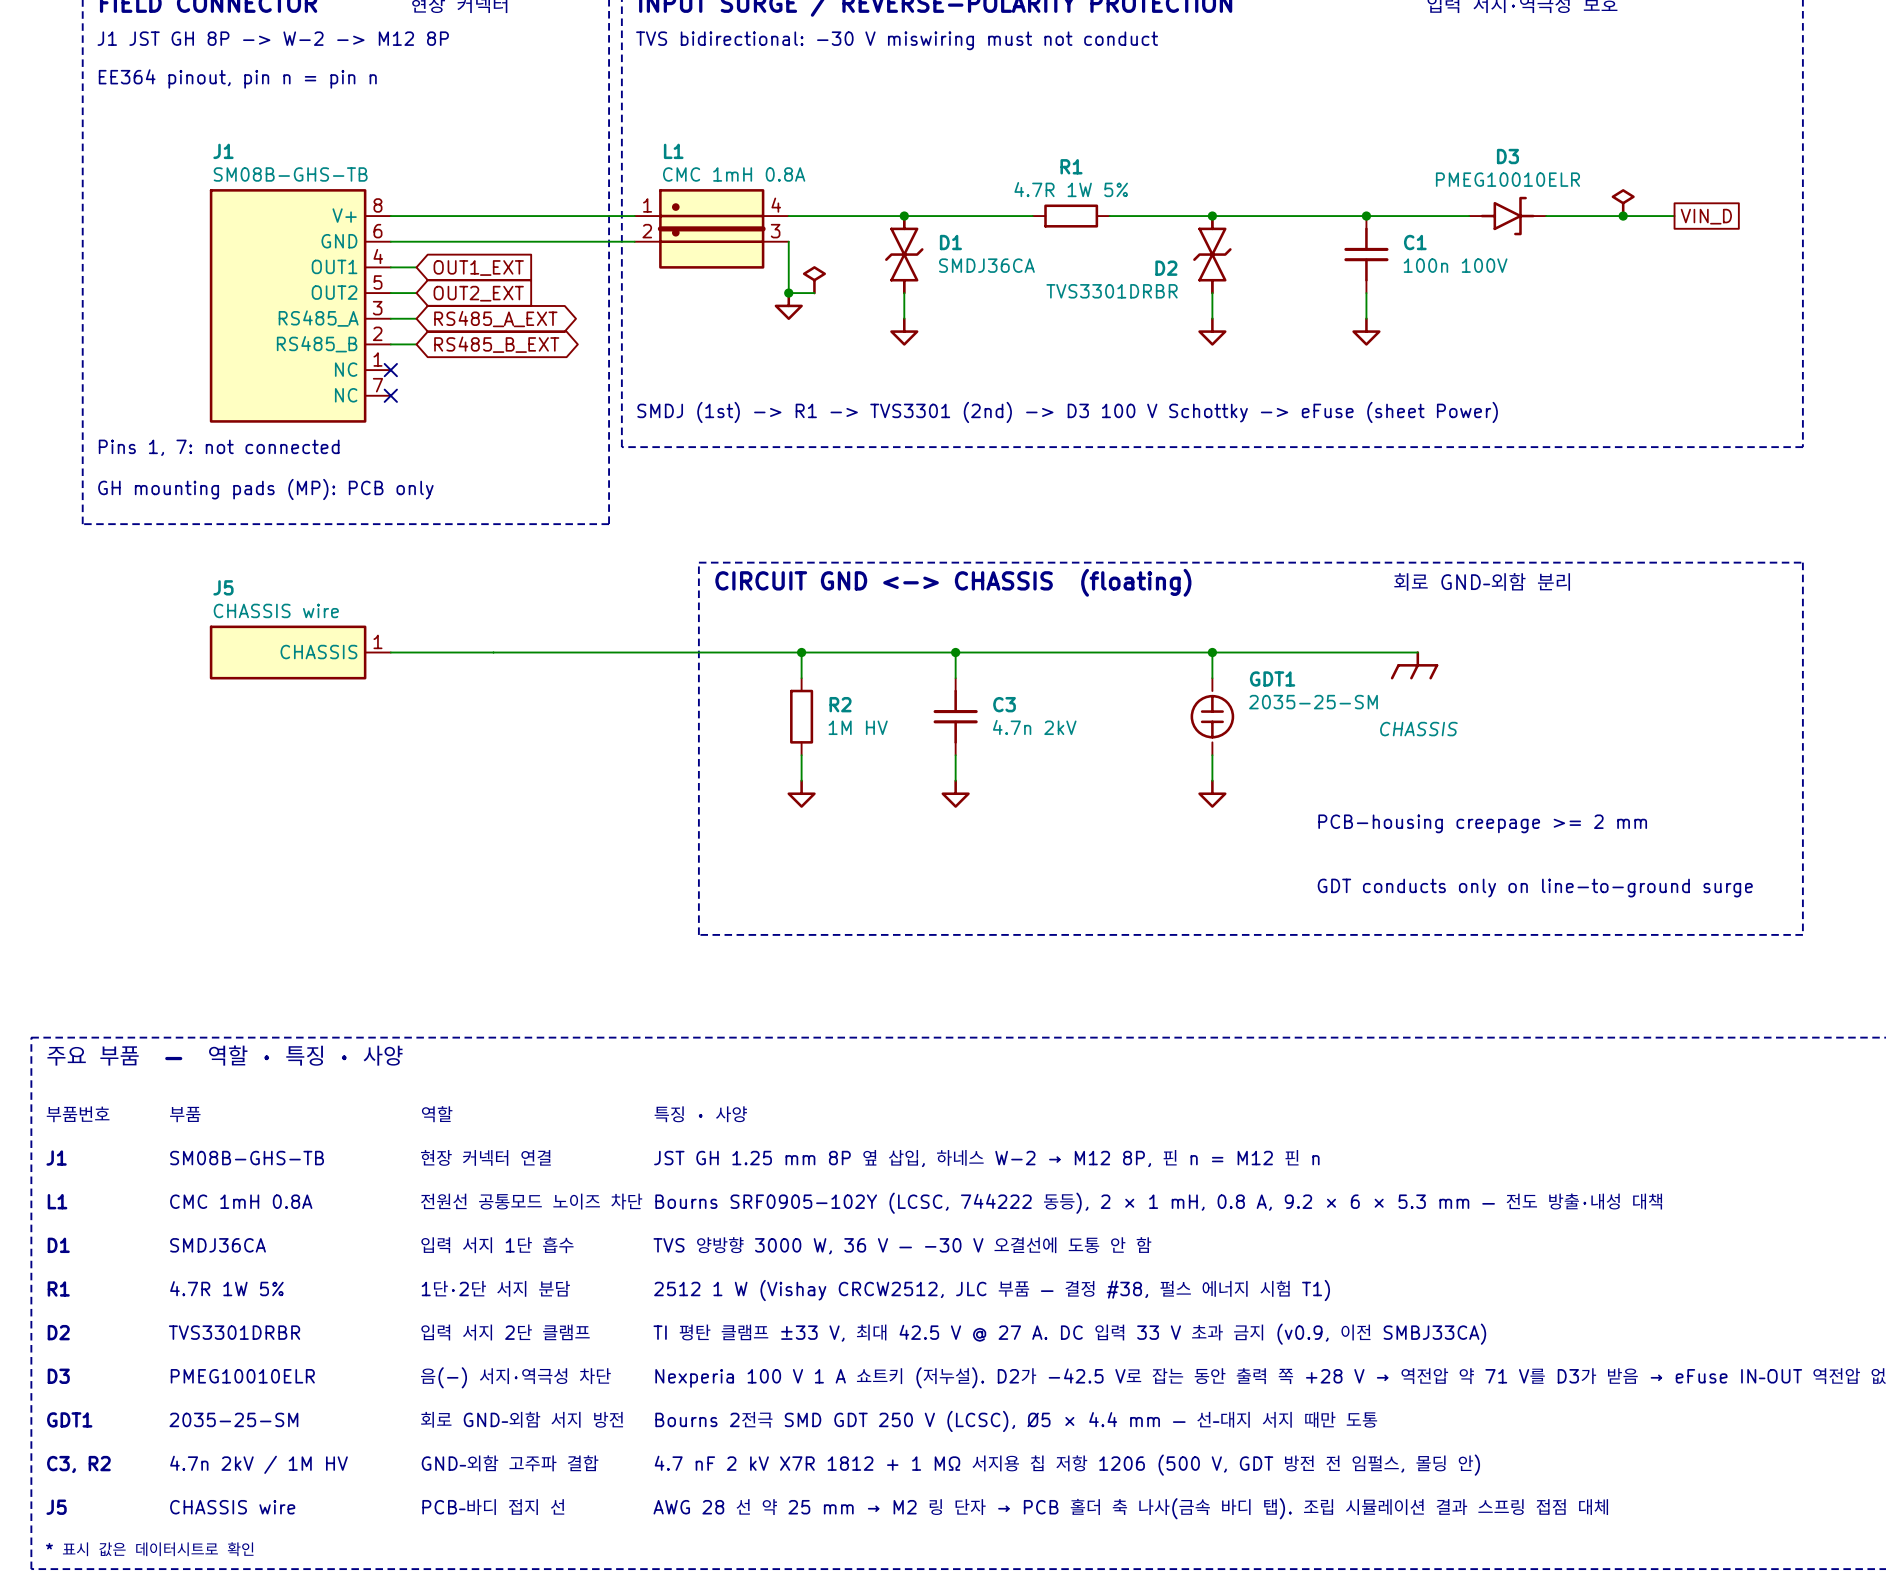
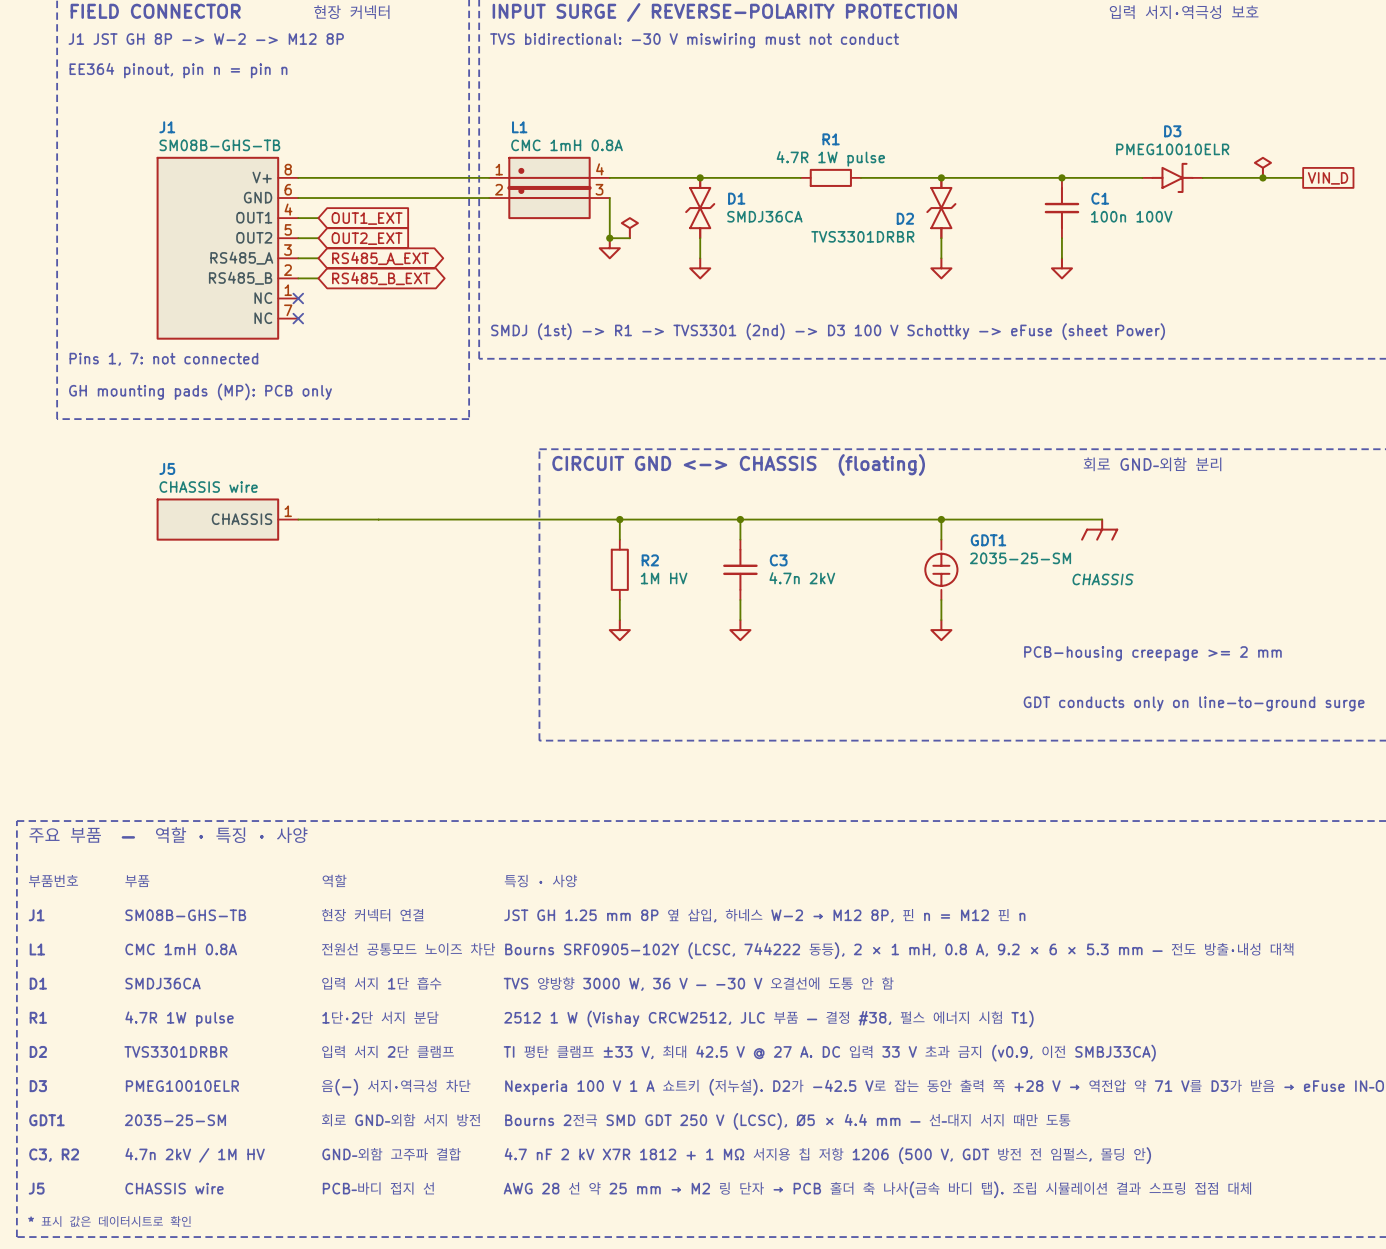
R1 value: 4.7R 1W 5% (1071, 189) -> 4.7R 1W pulse (830, 158)
text: 4.7R 1W 5% (226, 1288) -> 4.7R 1W pulse (179, 1019)

